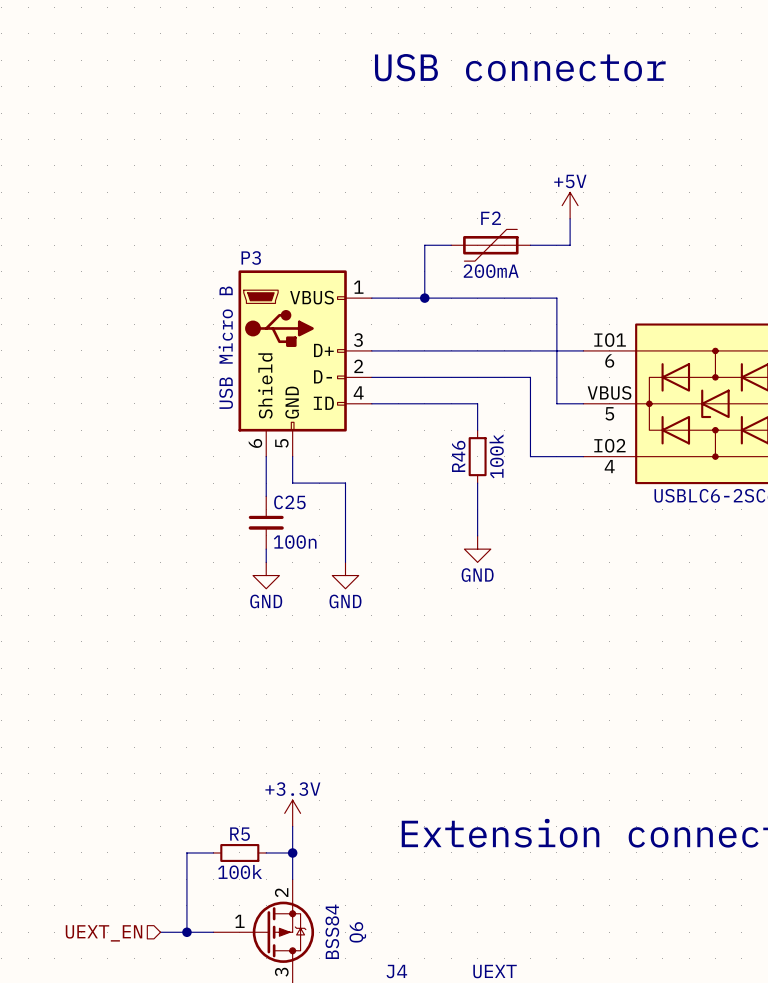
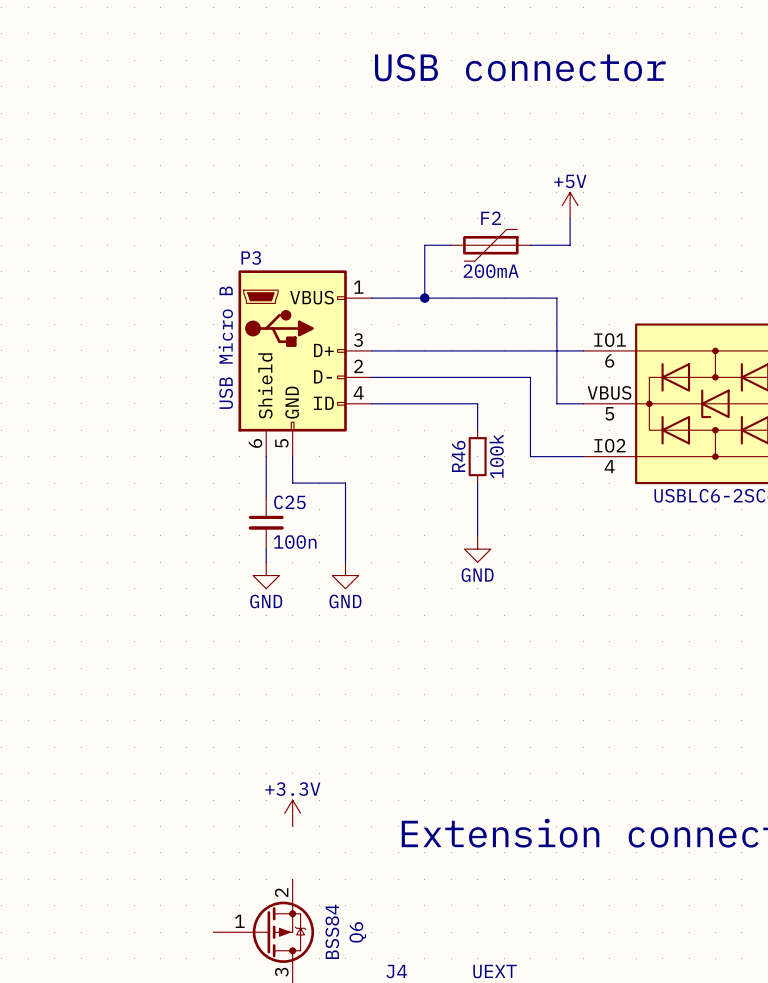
wire: (292, 826) (292, 879) -> none
wire: (213, 852) (186, 852) (186, 932) -> none
R5: 100k (239, 852) -> none
wire: (266, 852) (292, 852) -> none
junction: (292, 852) -> none
wire: (160, 932) (213, 932) -> none
junction: (186, 932) -> none
hierarchical label: UEXT_EN (104, 933) -> none

